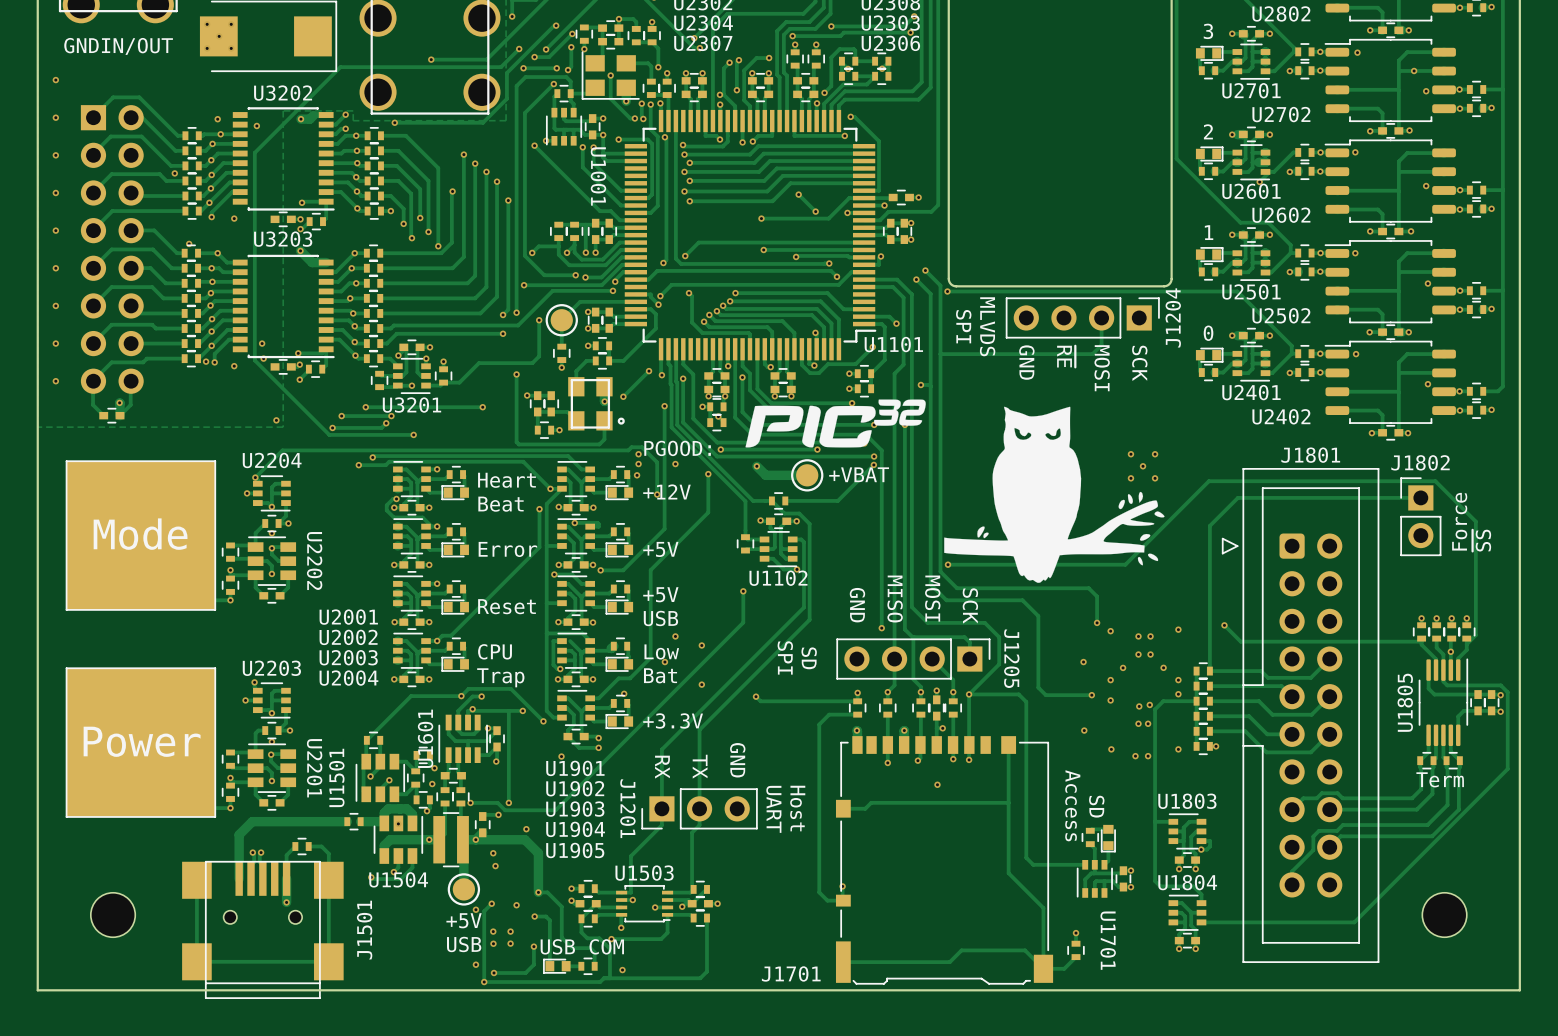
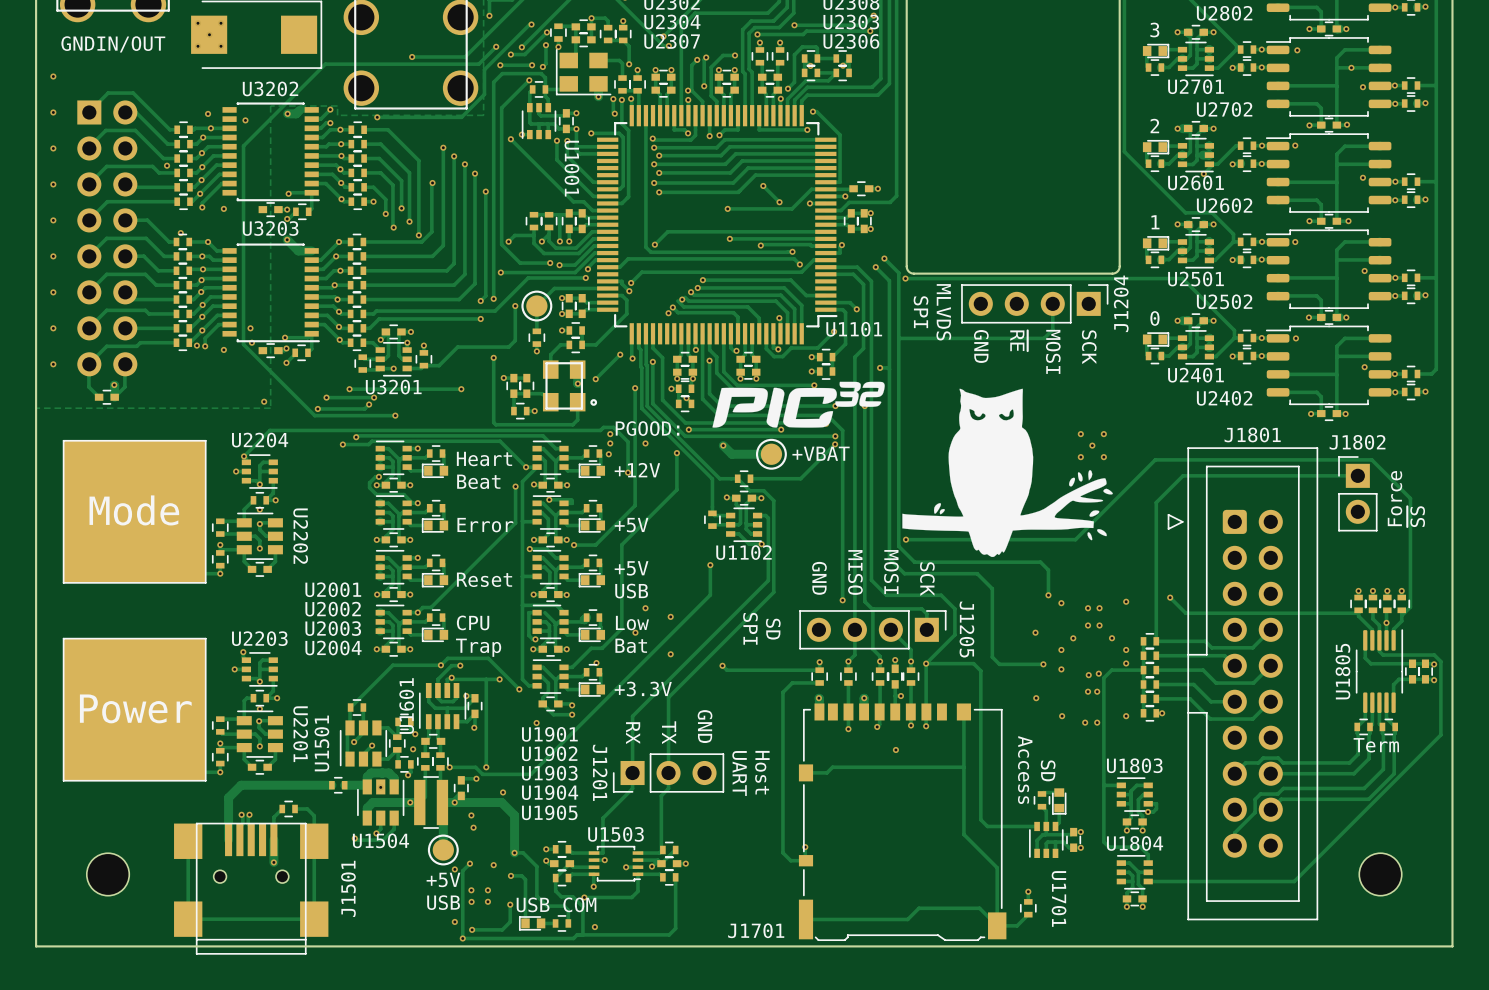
track: (610, 75) (610, 98) (630, 118) (634, 118) -> none
via: (610, 75) -> none
via: (634, 118) -> none
track: (664, 137) (666, 259) (663, 263) -> none
via: (664, 137) -> none
via: (663, 263) -> none
track: (689, 293) (692, 296) (692, 322) (702, 333) (748, 333) (749, 349) -> none
via: (689, 293) -> none
via: (716, 311) -> none
via: none -> (682, 299)
via: (709, 314) -> none
via: none -> (668, 313)

